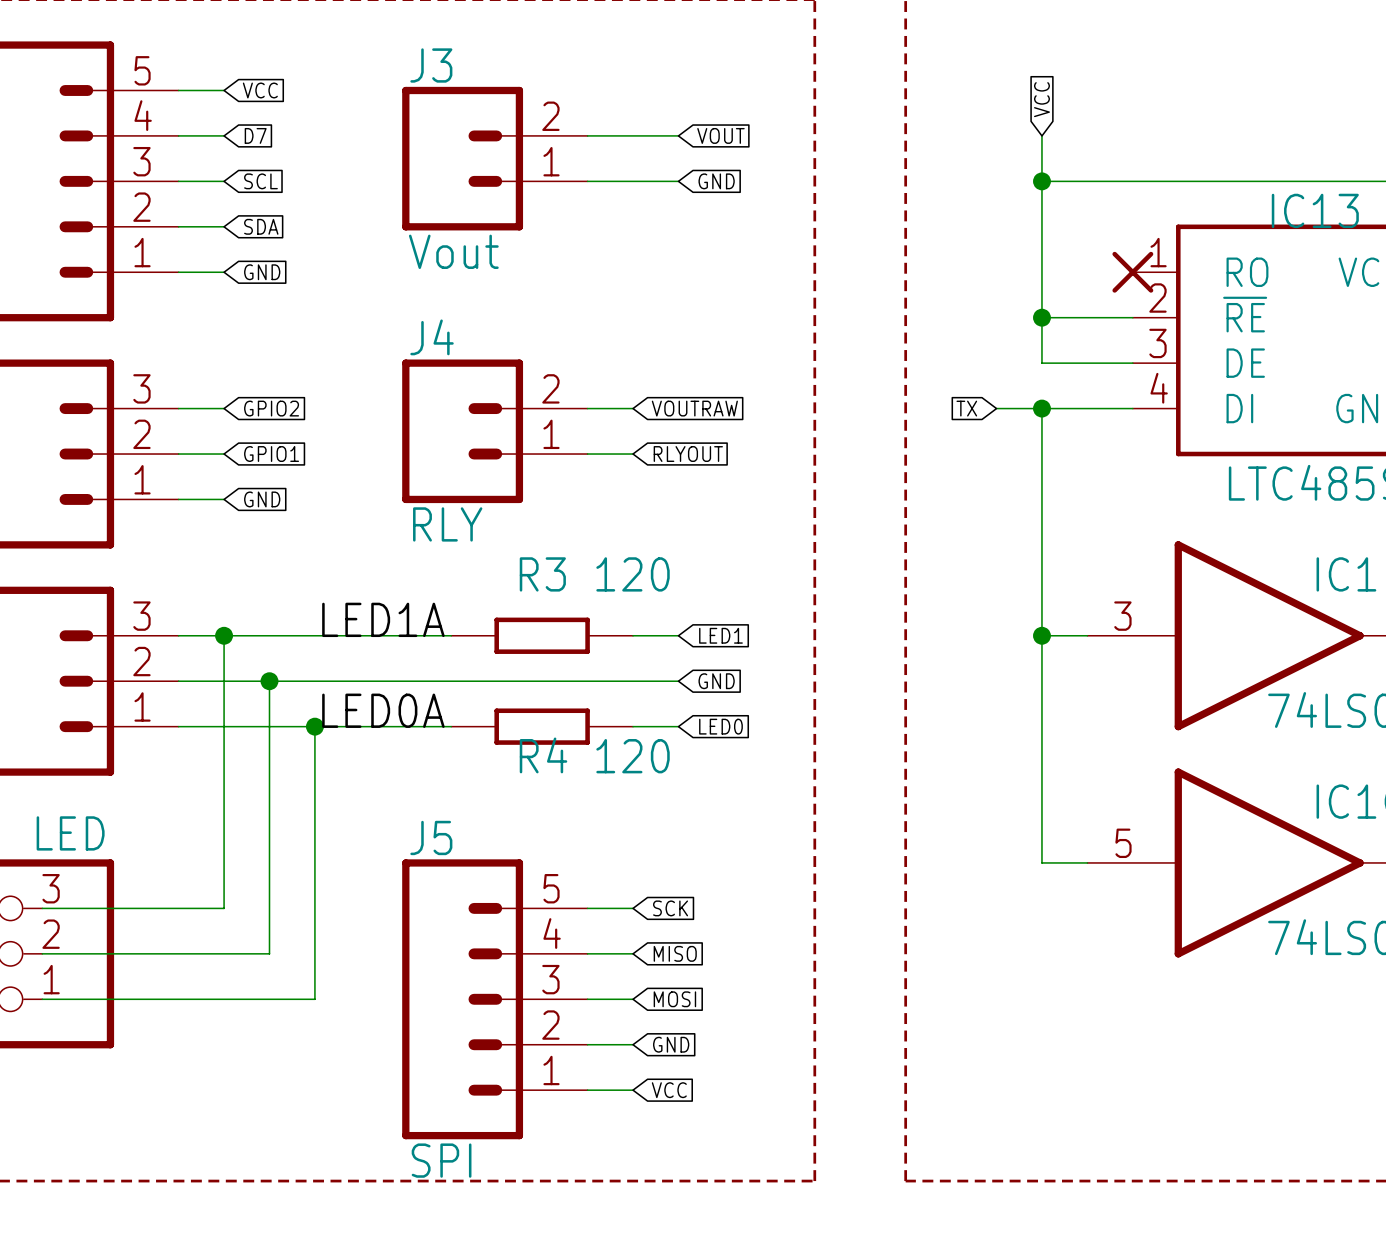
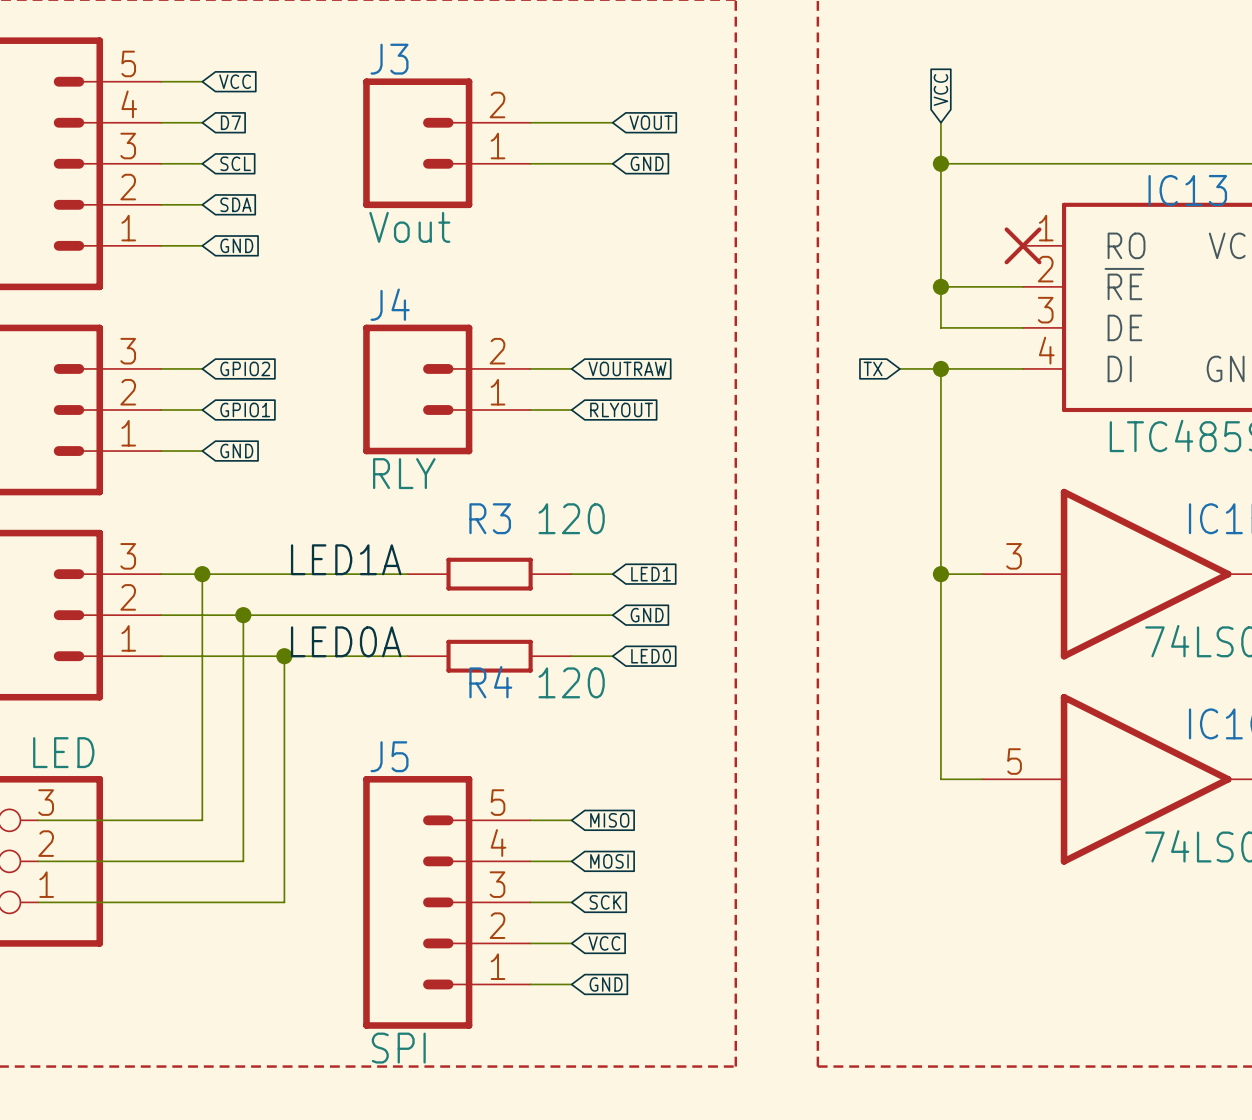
global label: SCK (670, 908) -> MISO (609, 820)
global label: MISO (675, 953) -> MOSI (609, 861)
global label: MOSI (674, 999) -> SCK (605, 902)
global label: GND (671, 1044) -> VCC (604, 943)
global label: VCC (669, 1090) -> GND (606, 984)

